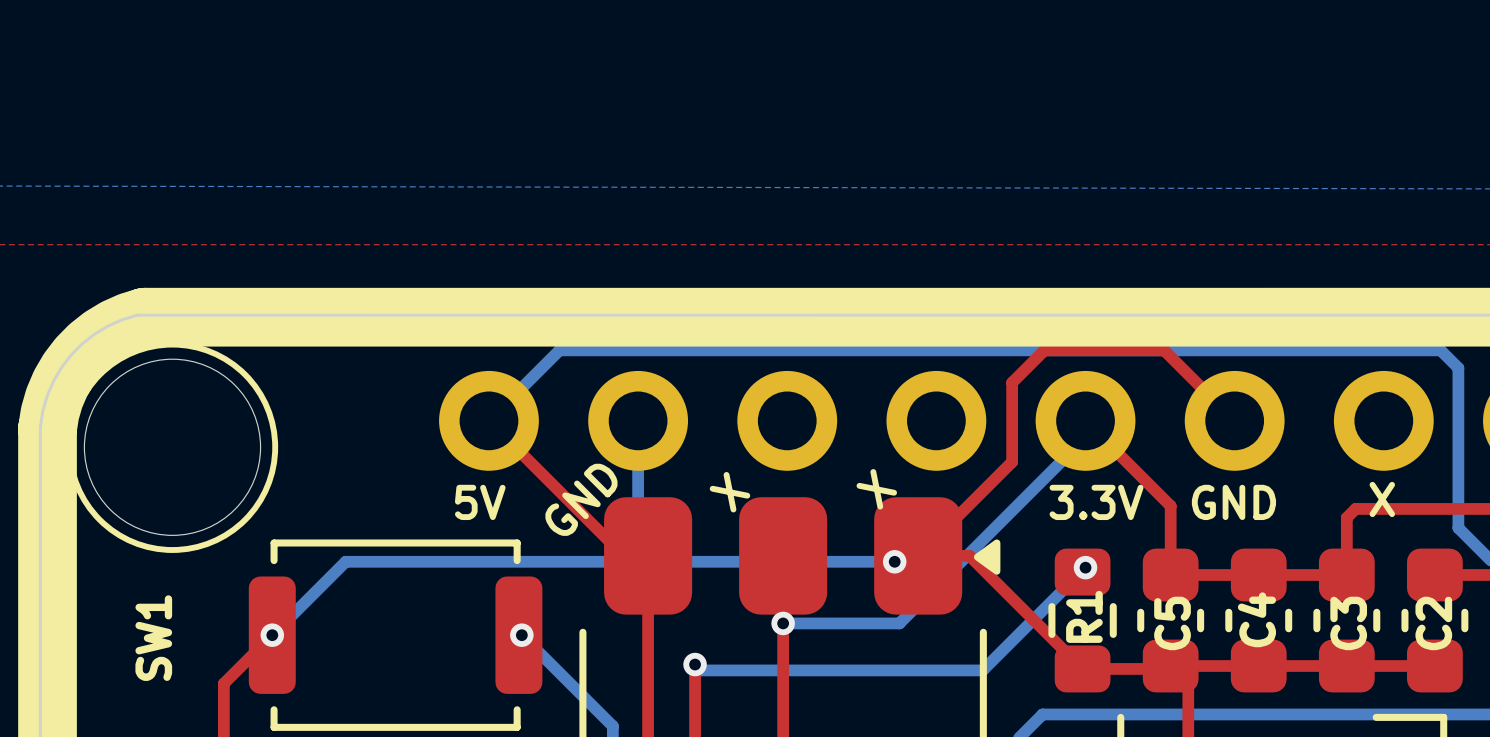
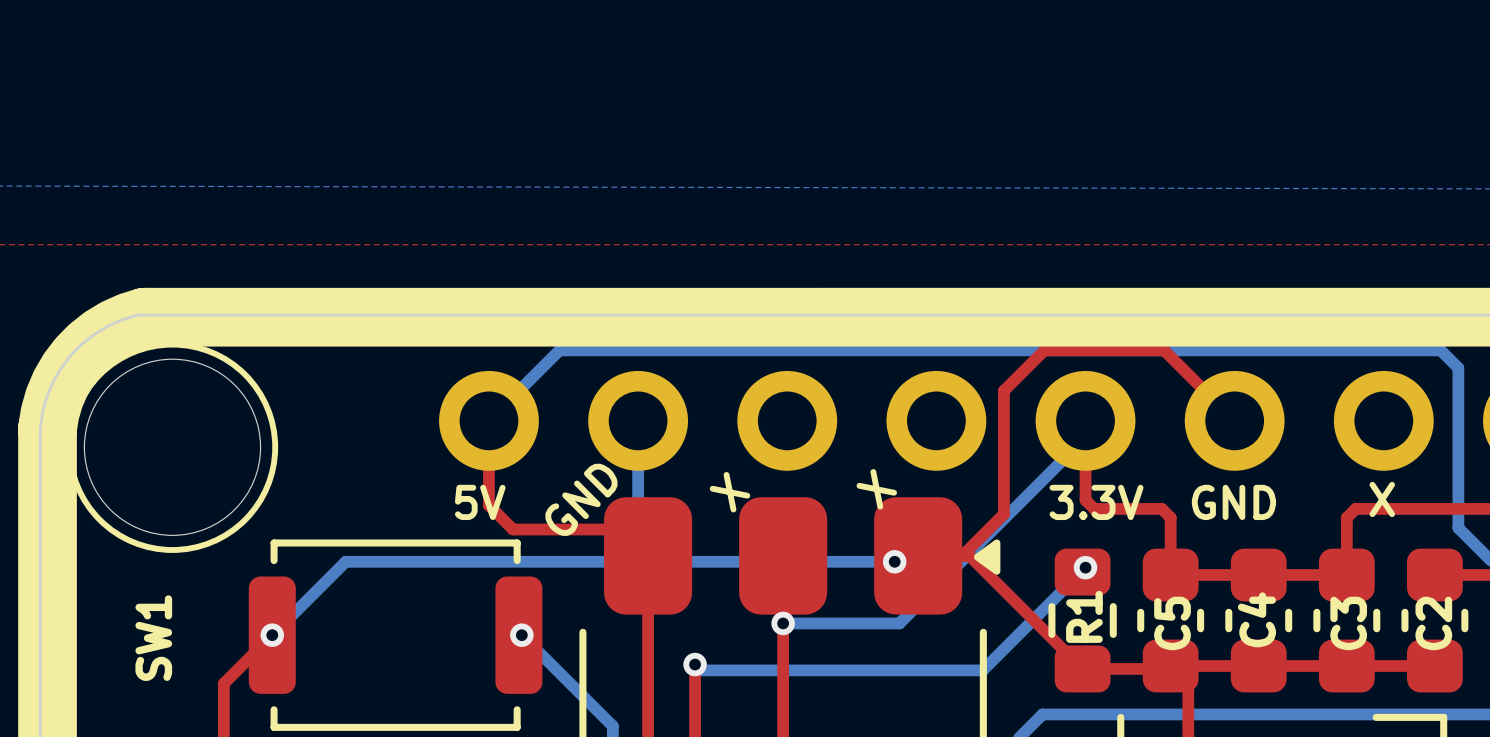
top track: (1012, 382) (1012, 461) (918, 555) -> (1012, 382) (1003, 390) (1003, 514) (962, 555)
top track: (488, 420) (624, 555) (648, 555) -> (488, 420) (488, 505) (513, 529) (621, 529) (648, 555)
top track: (1085, 420) (1170, 506) (1170, 517) -> (1085, 420) (1085, 500) (1094, 508) (1161, 508) (1170, 517)

